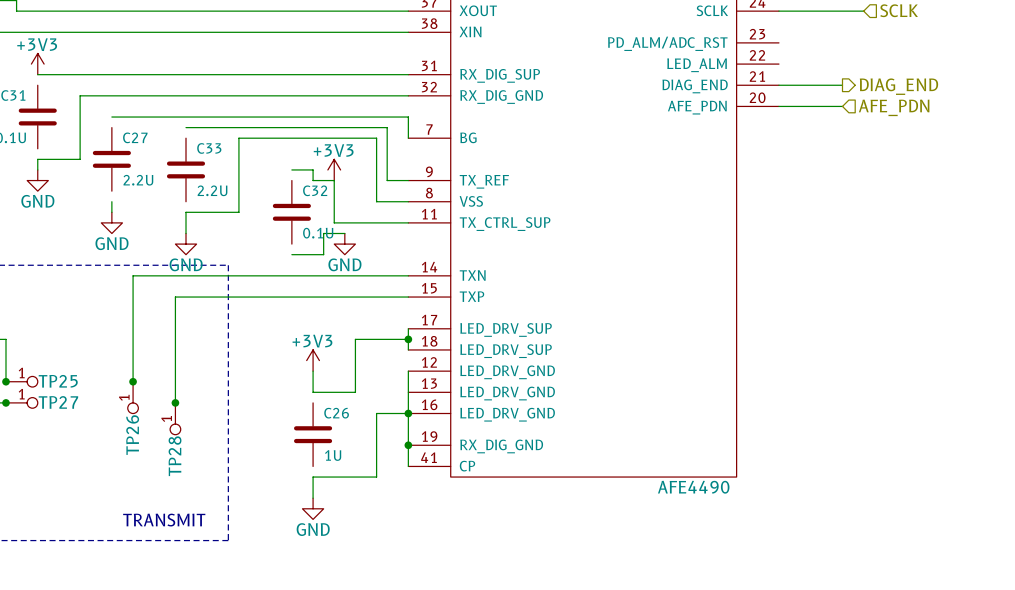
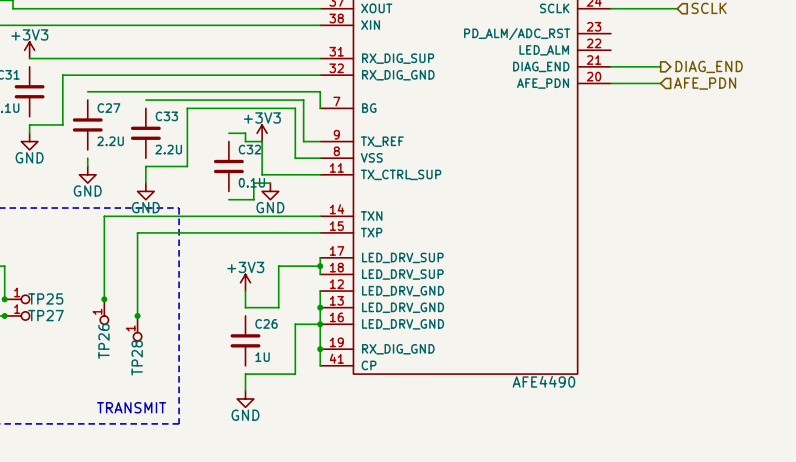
junction: none -> (320, 307)

